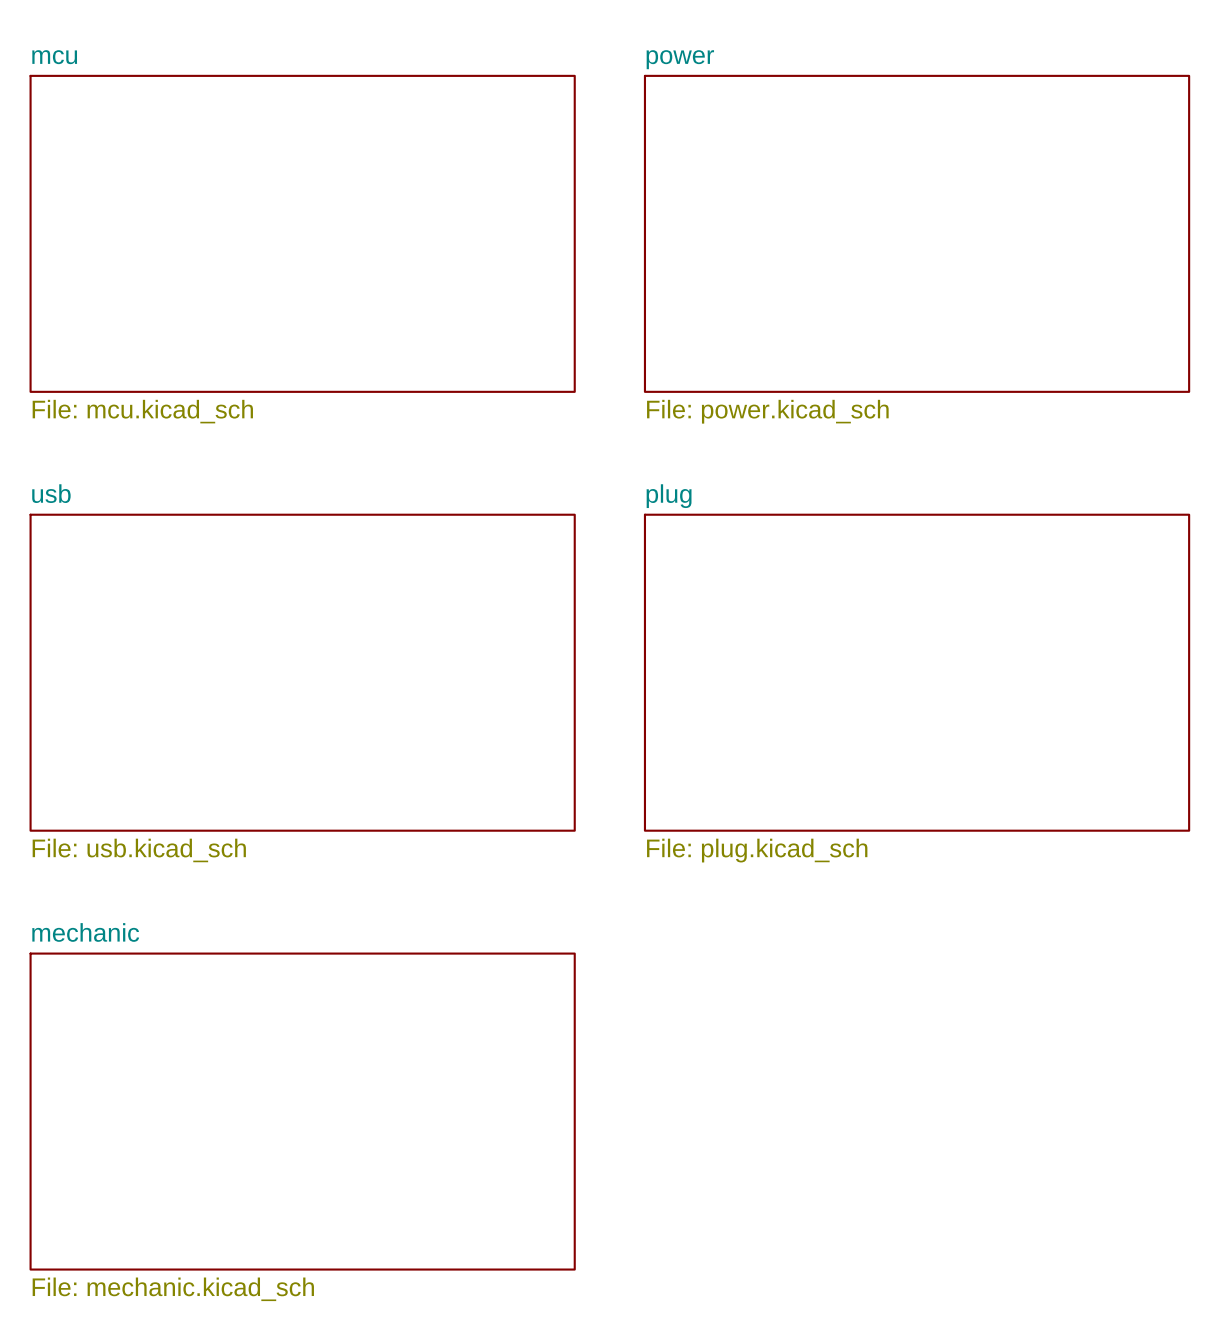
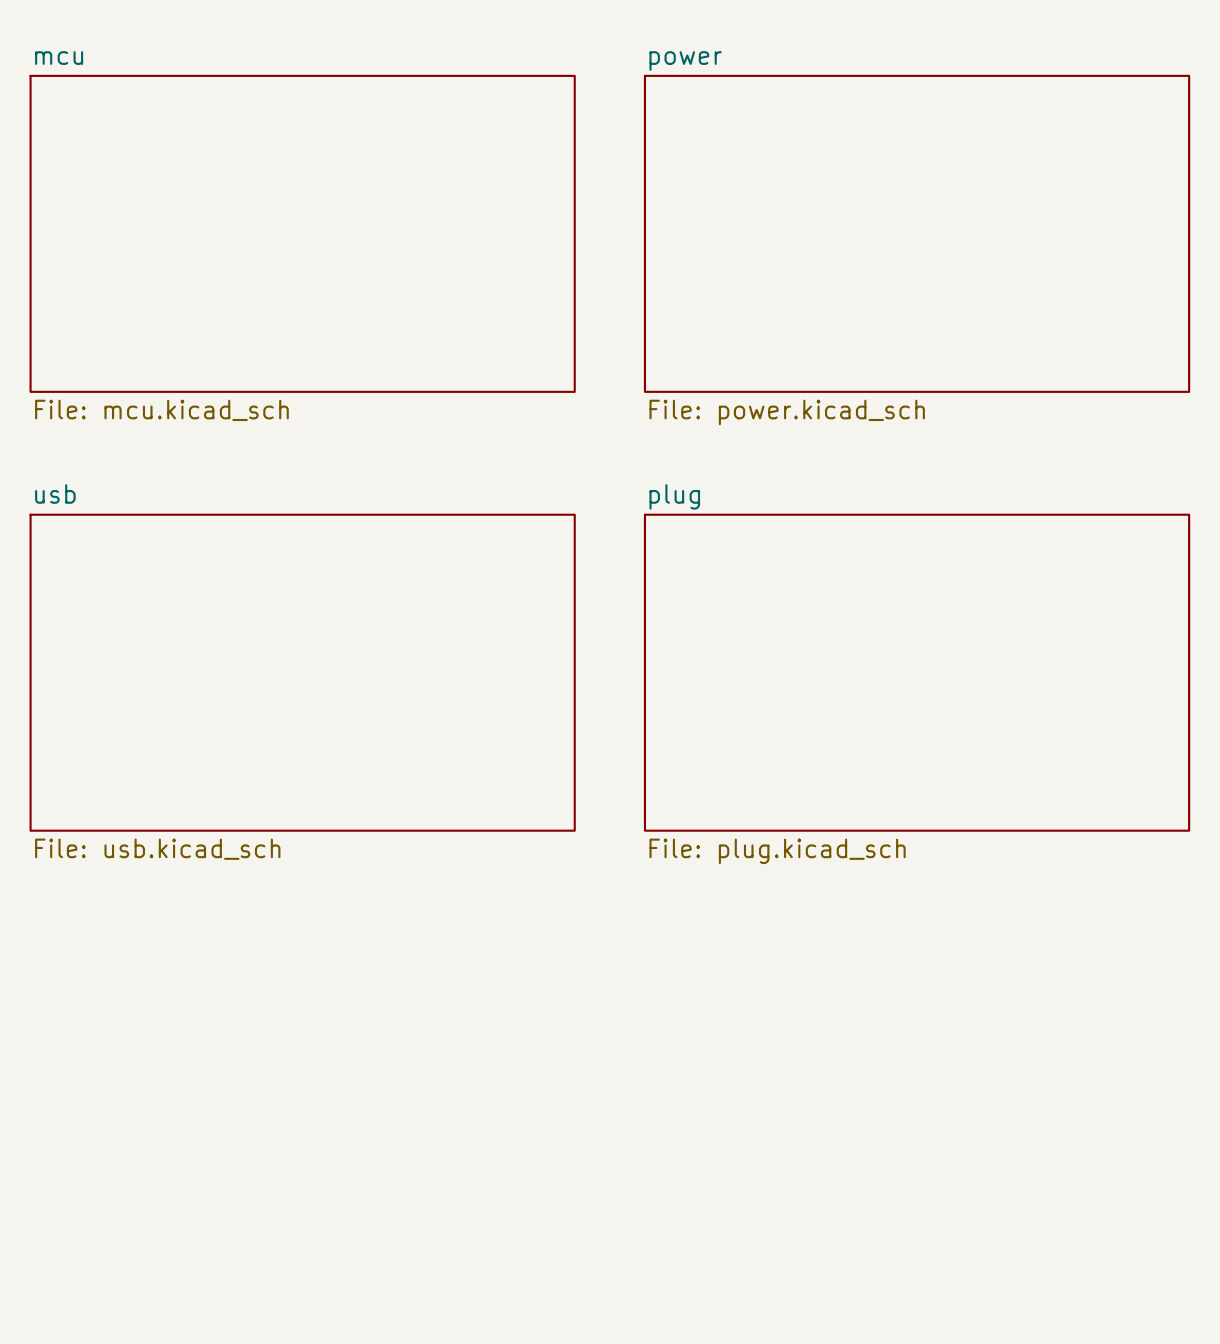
sheet mechanic: File: mechanic.kicad_sch (302, 1111) -> none

